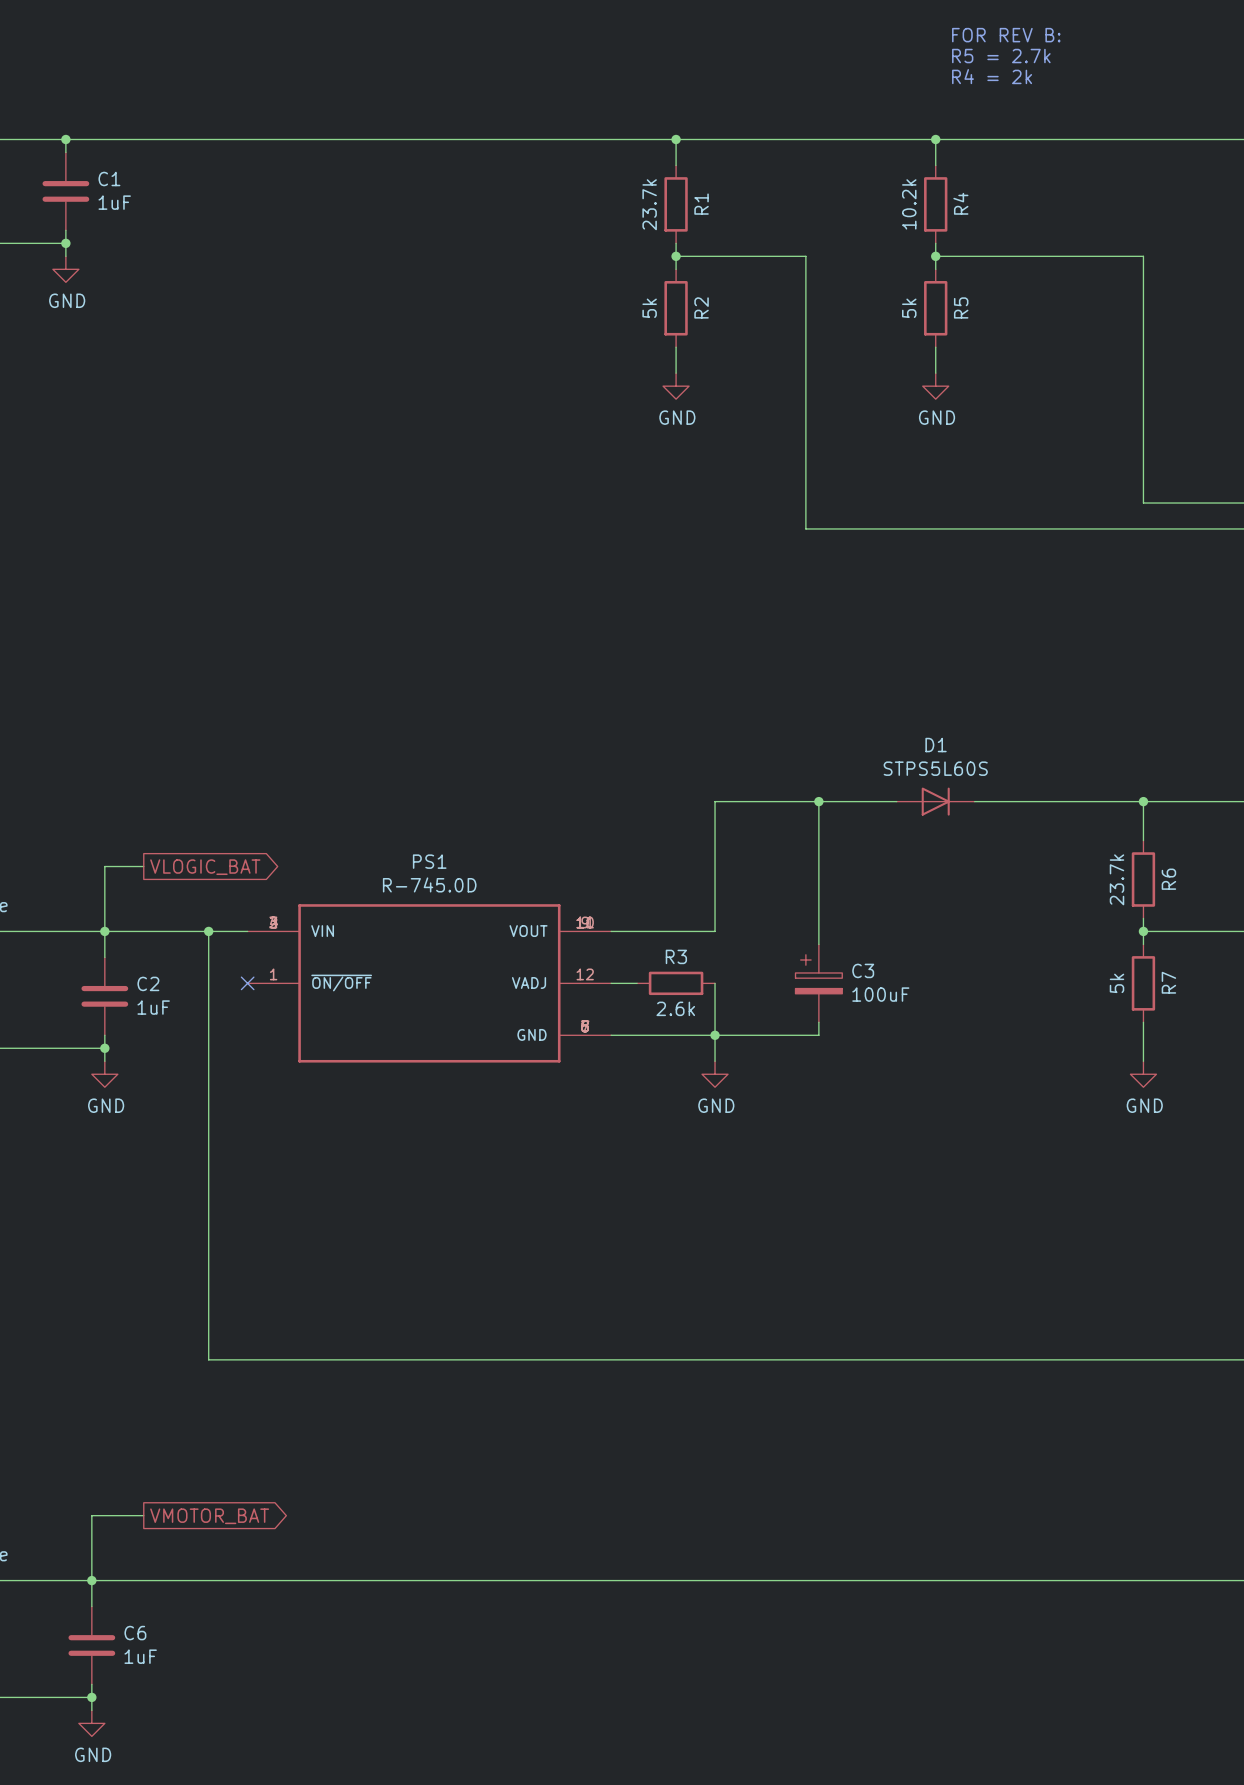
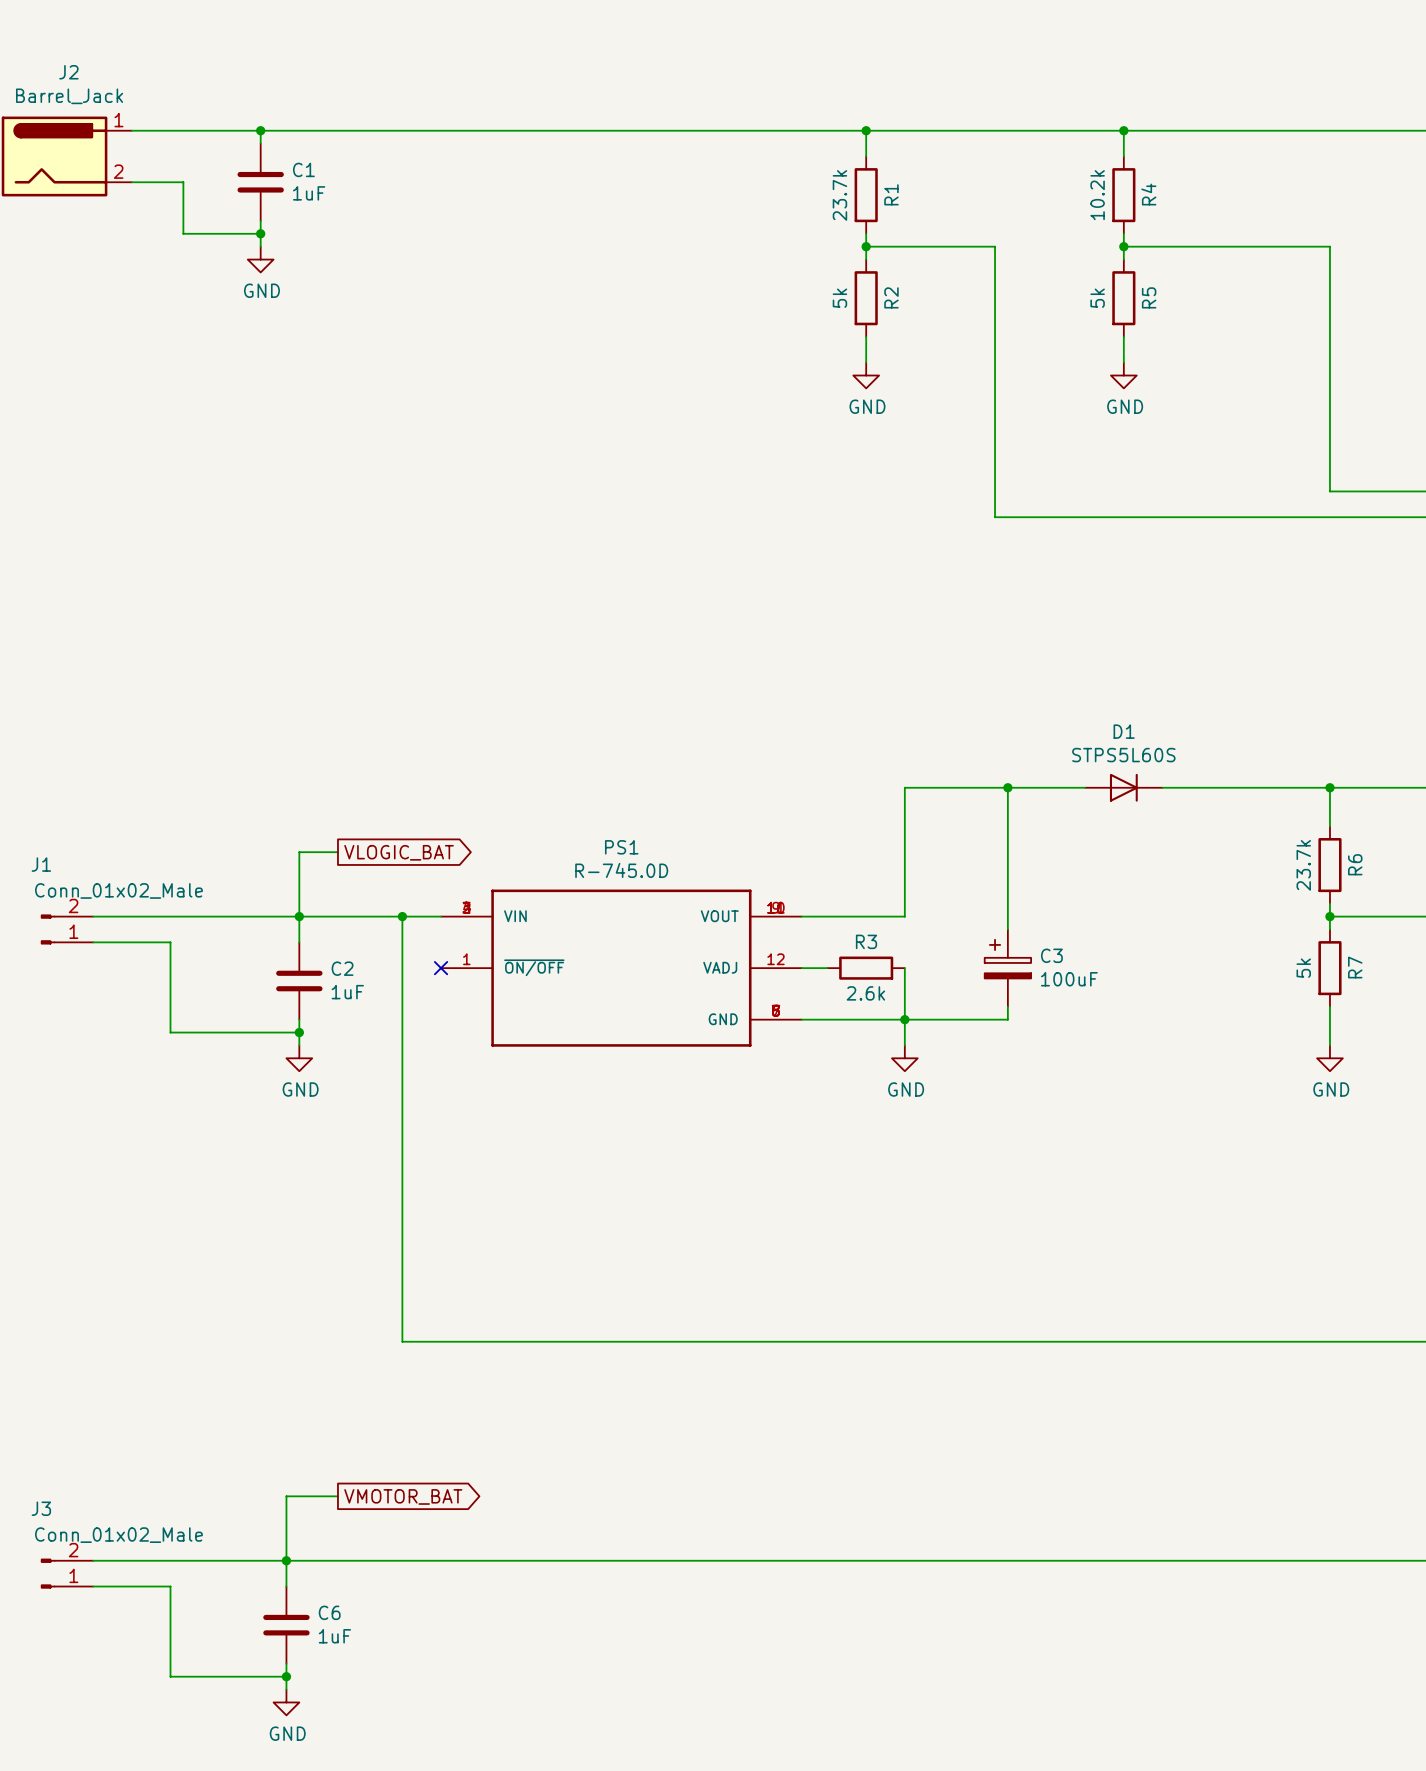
text: FOR REV B: (1006, 35) -> none
text: R5 = 2.7k (1001, 56) -> none
text: R4 = 2k (992, 76) -> none

